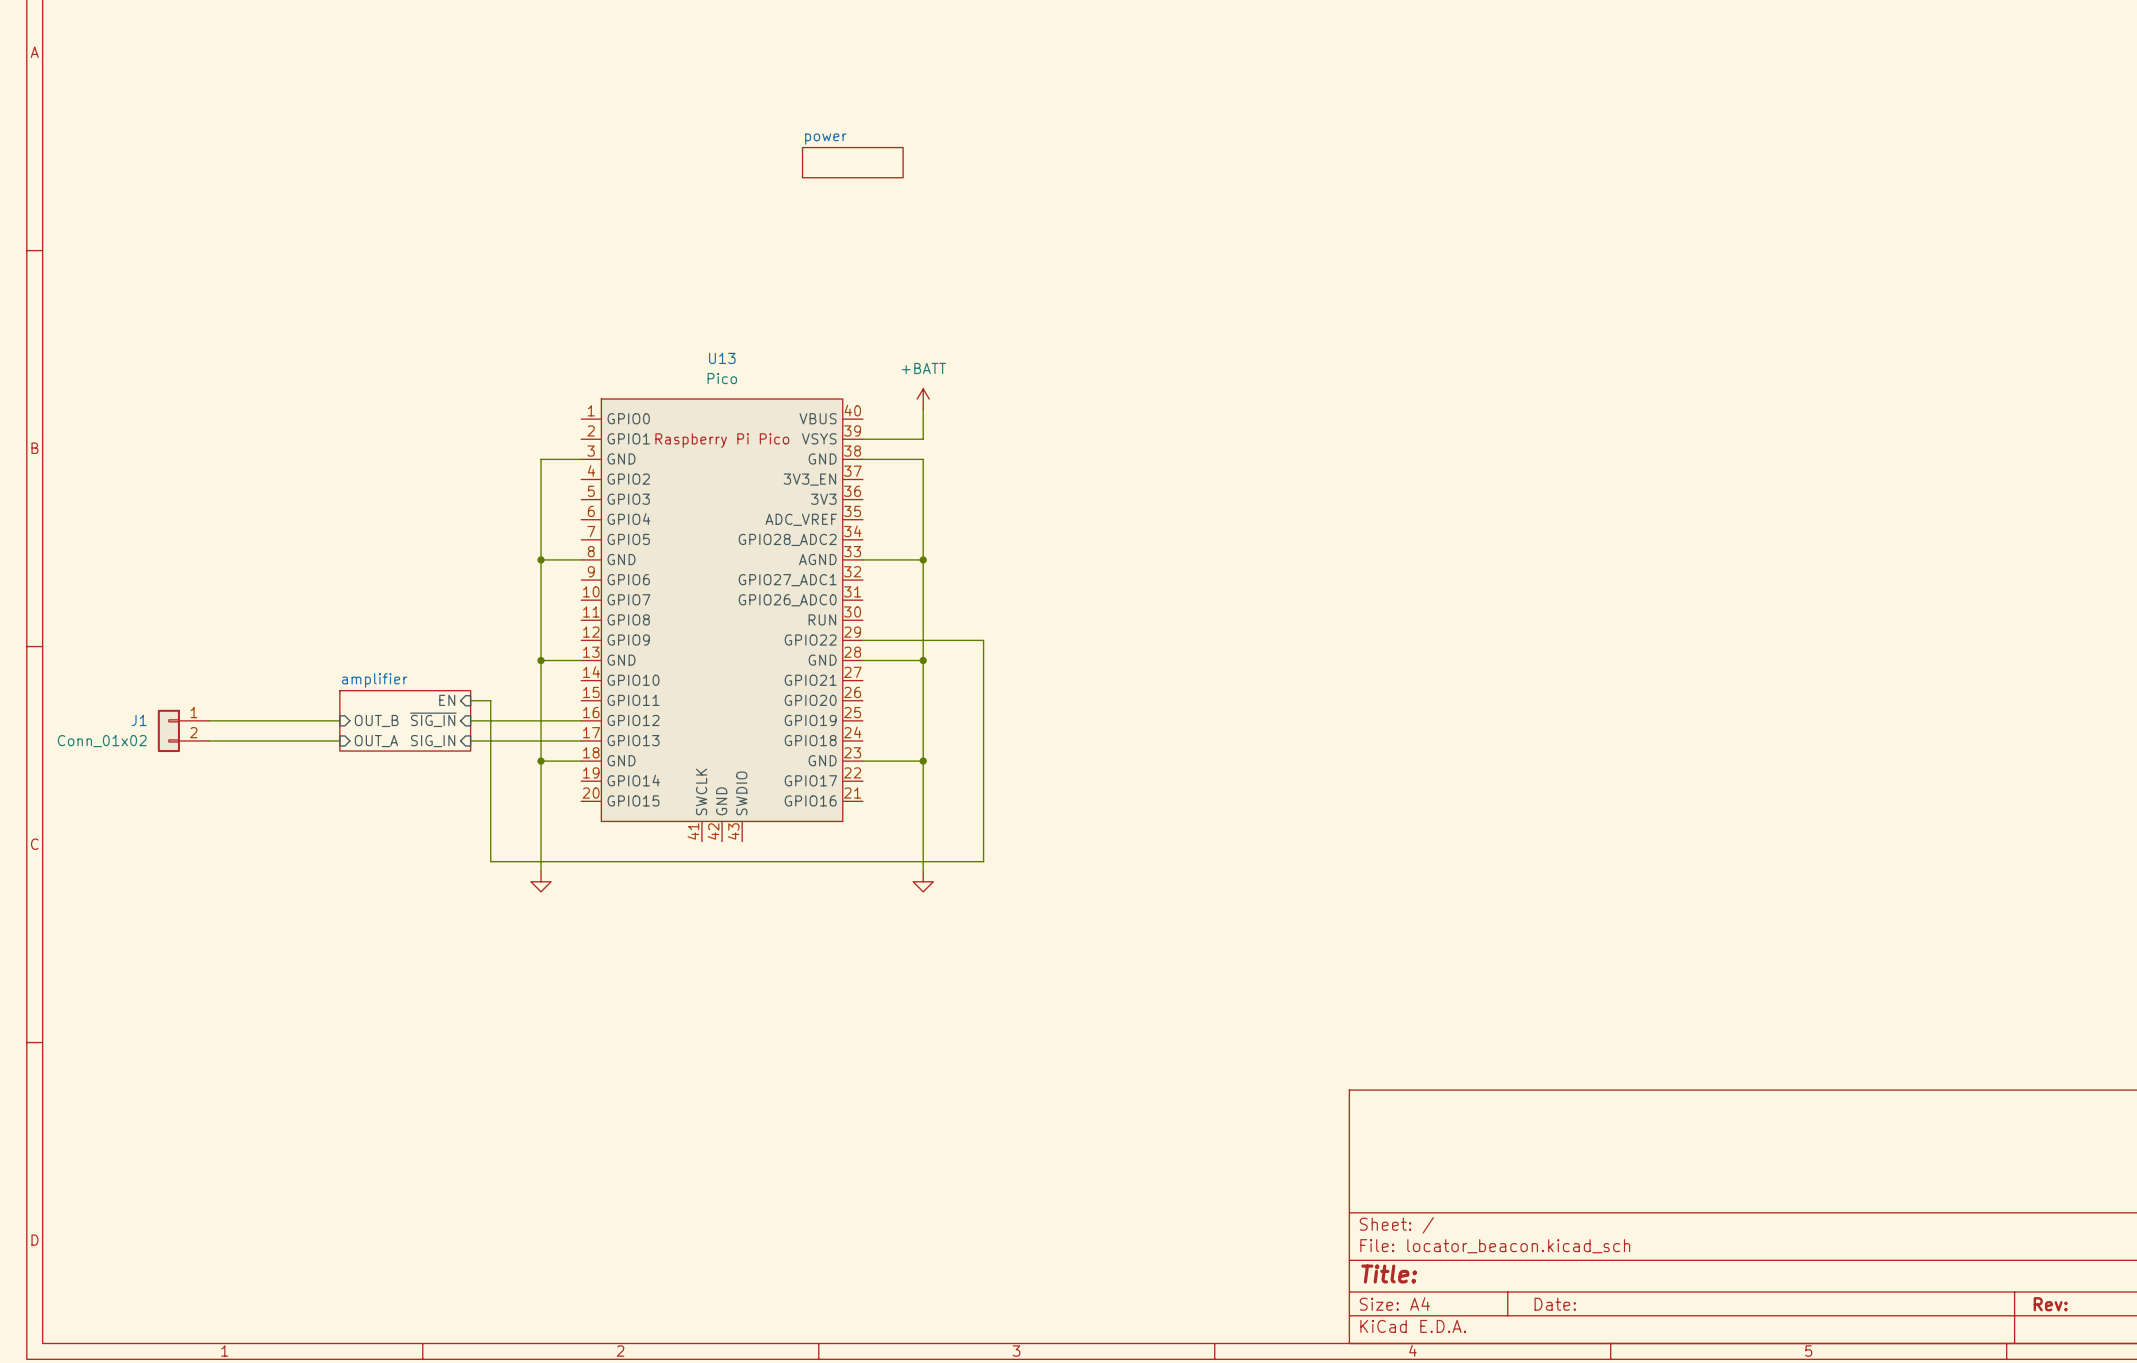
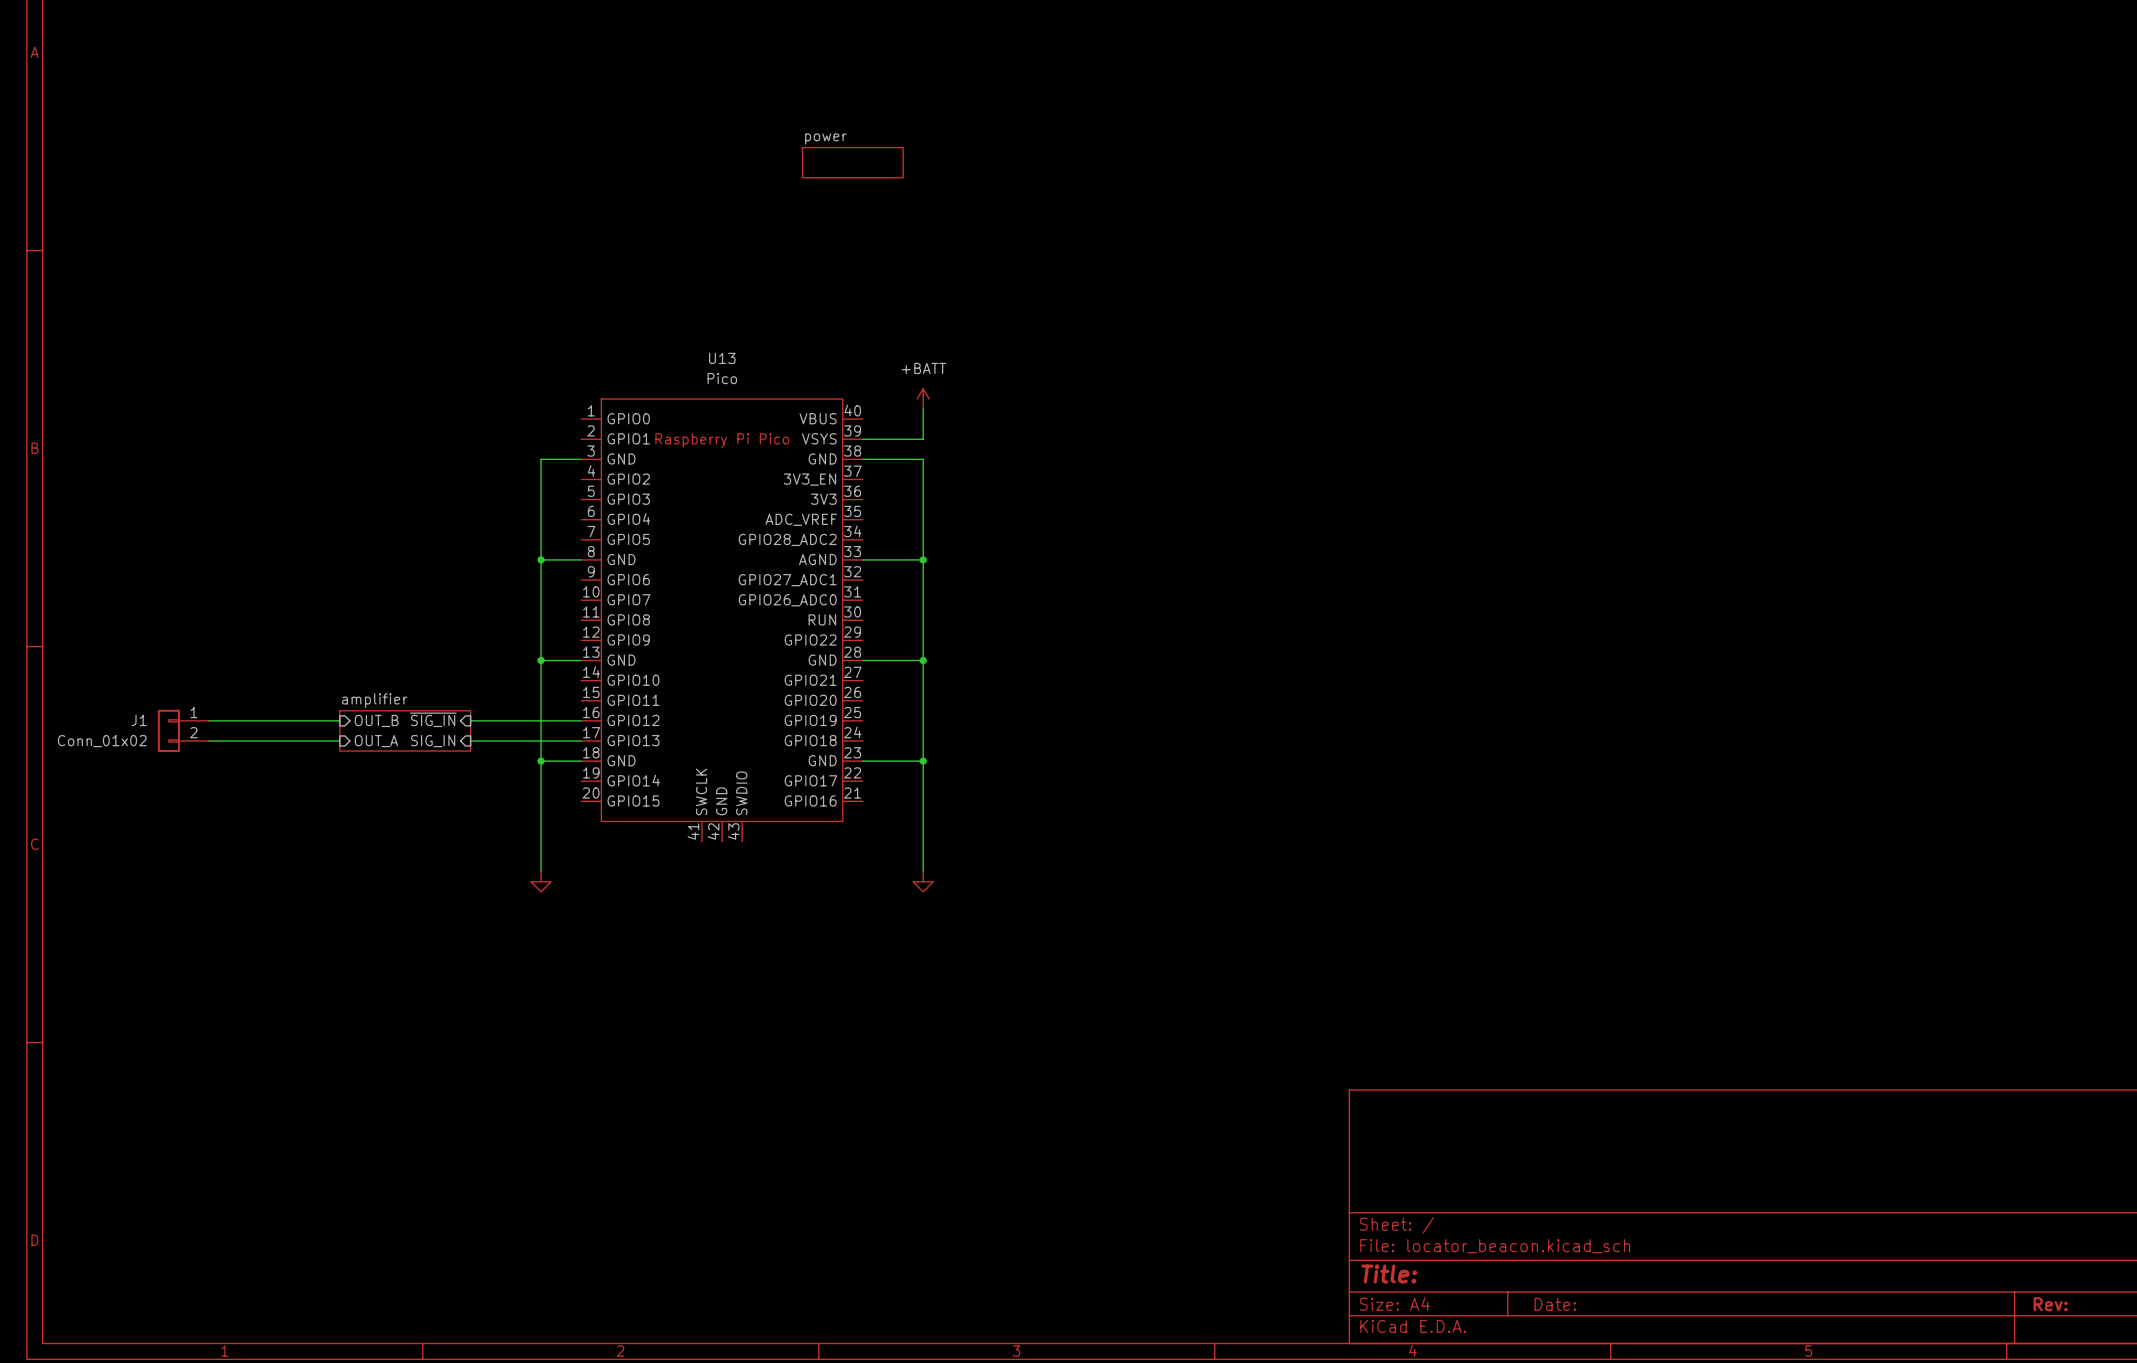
wire: (862, 640) (983, 640) (983, 861) (490, 861) (490, 700) (470, 700) -> none
sheet pin: EN (447, 700) -> none
sheet amplifier: (405, 720) -> none
sheet amplifier: none -> (405, 730)

